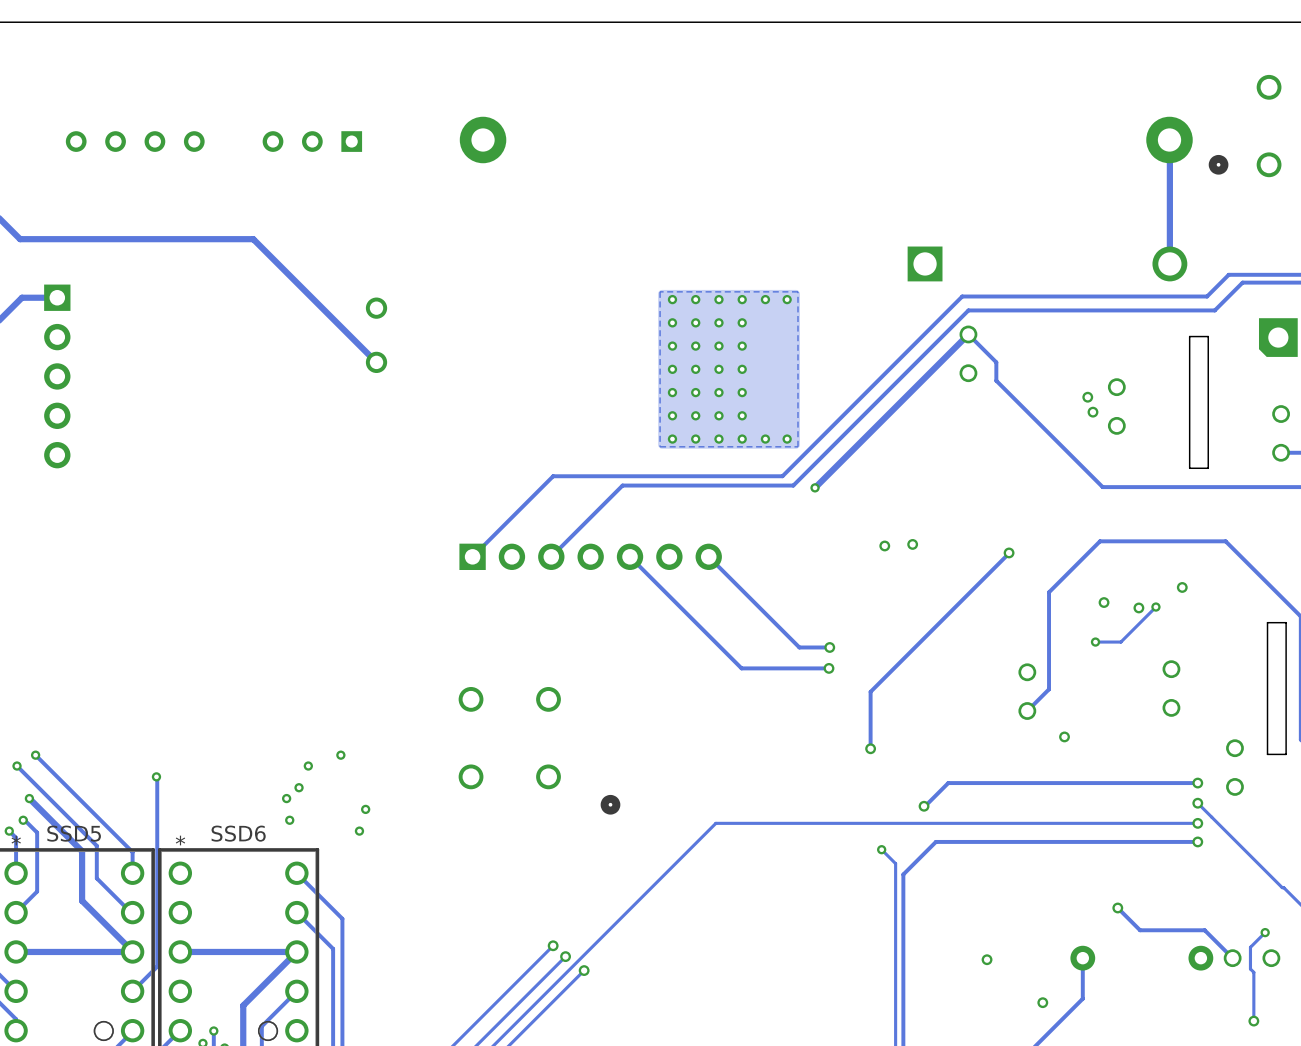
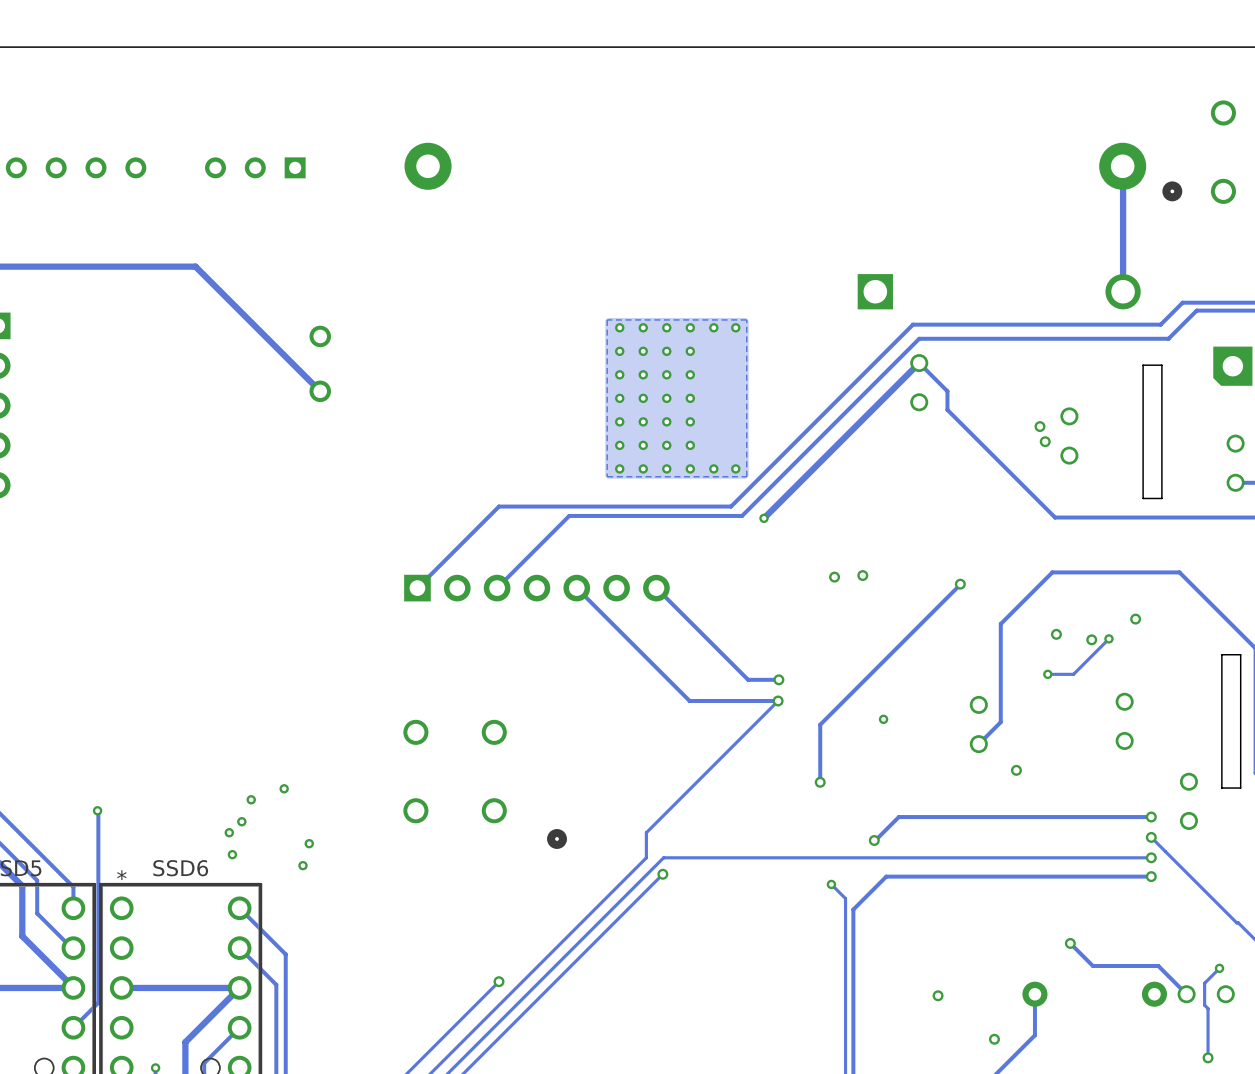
track: none -> (778, 700) (646, 832) (646, 857) (511, 992)
via: none -> (883, 719)
track: none -> (662, 874) (530, 1006)
via: none -> (662, 874)
via: (565, 956) -> none
via: (584, 970) -> none

